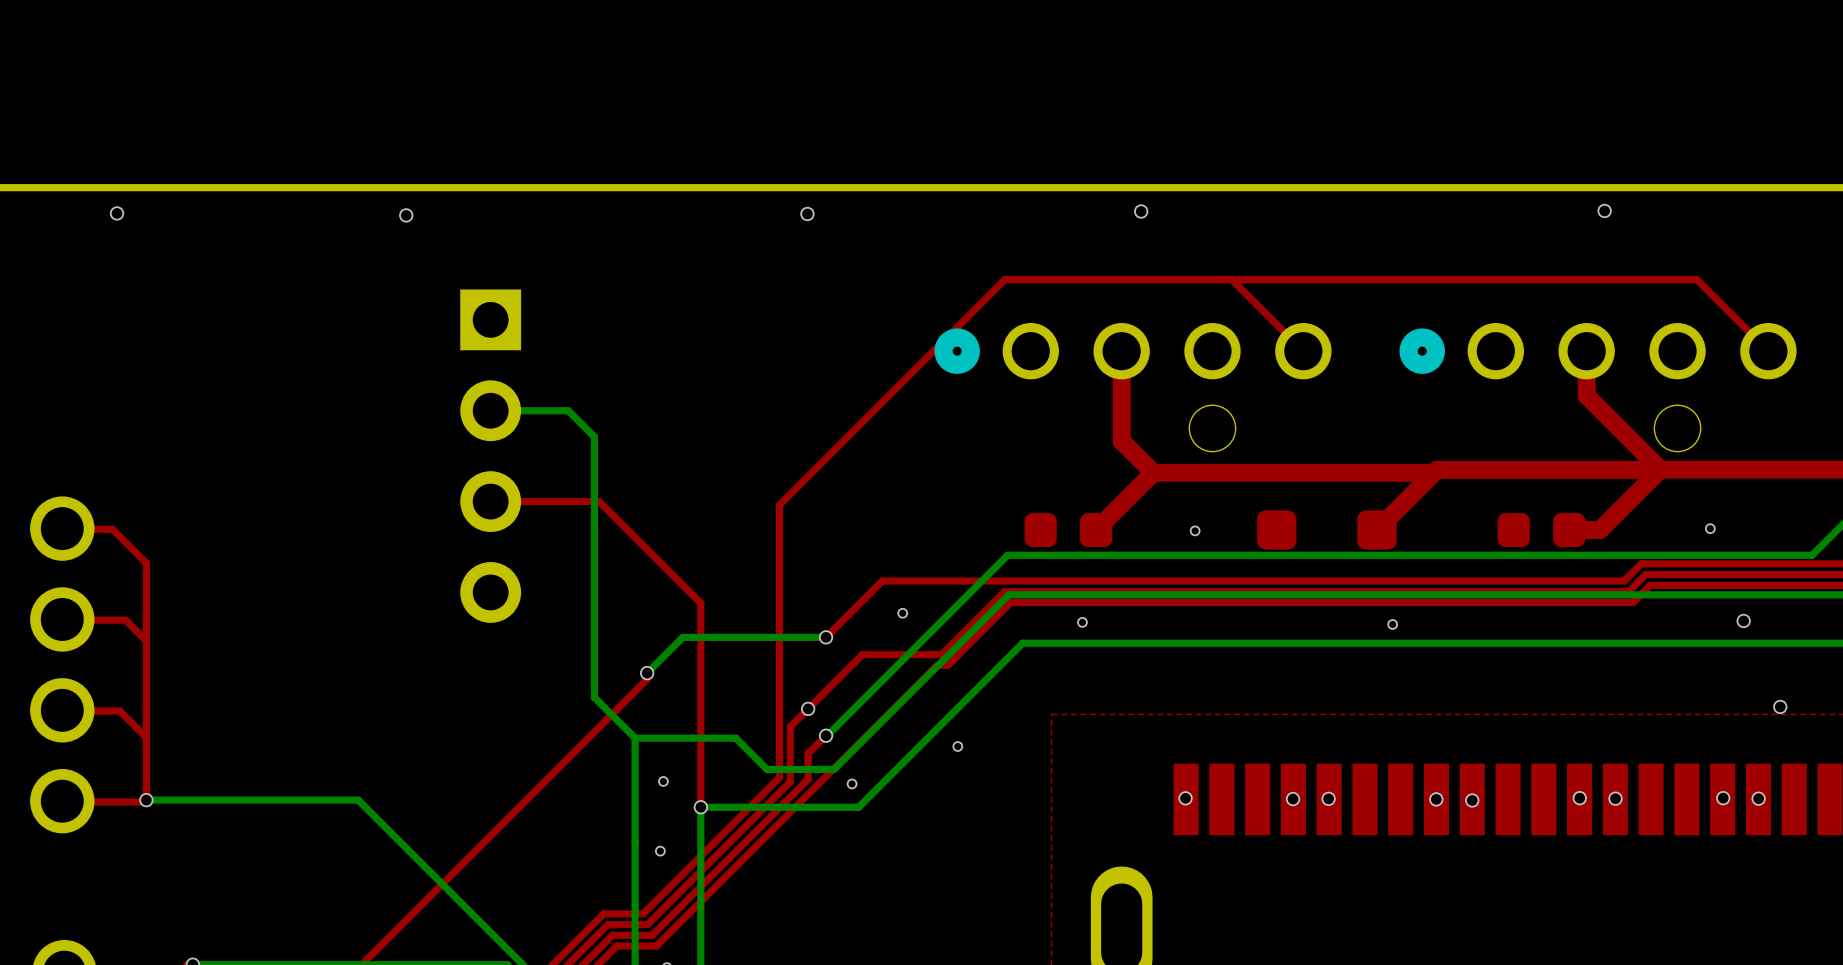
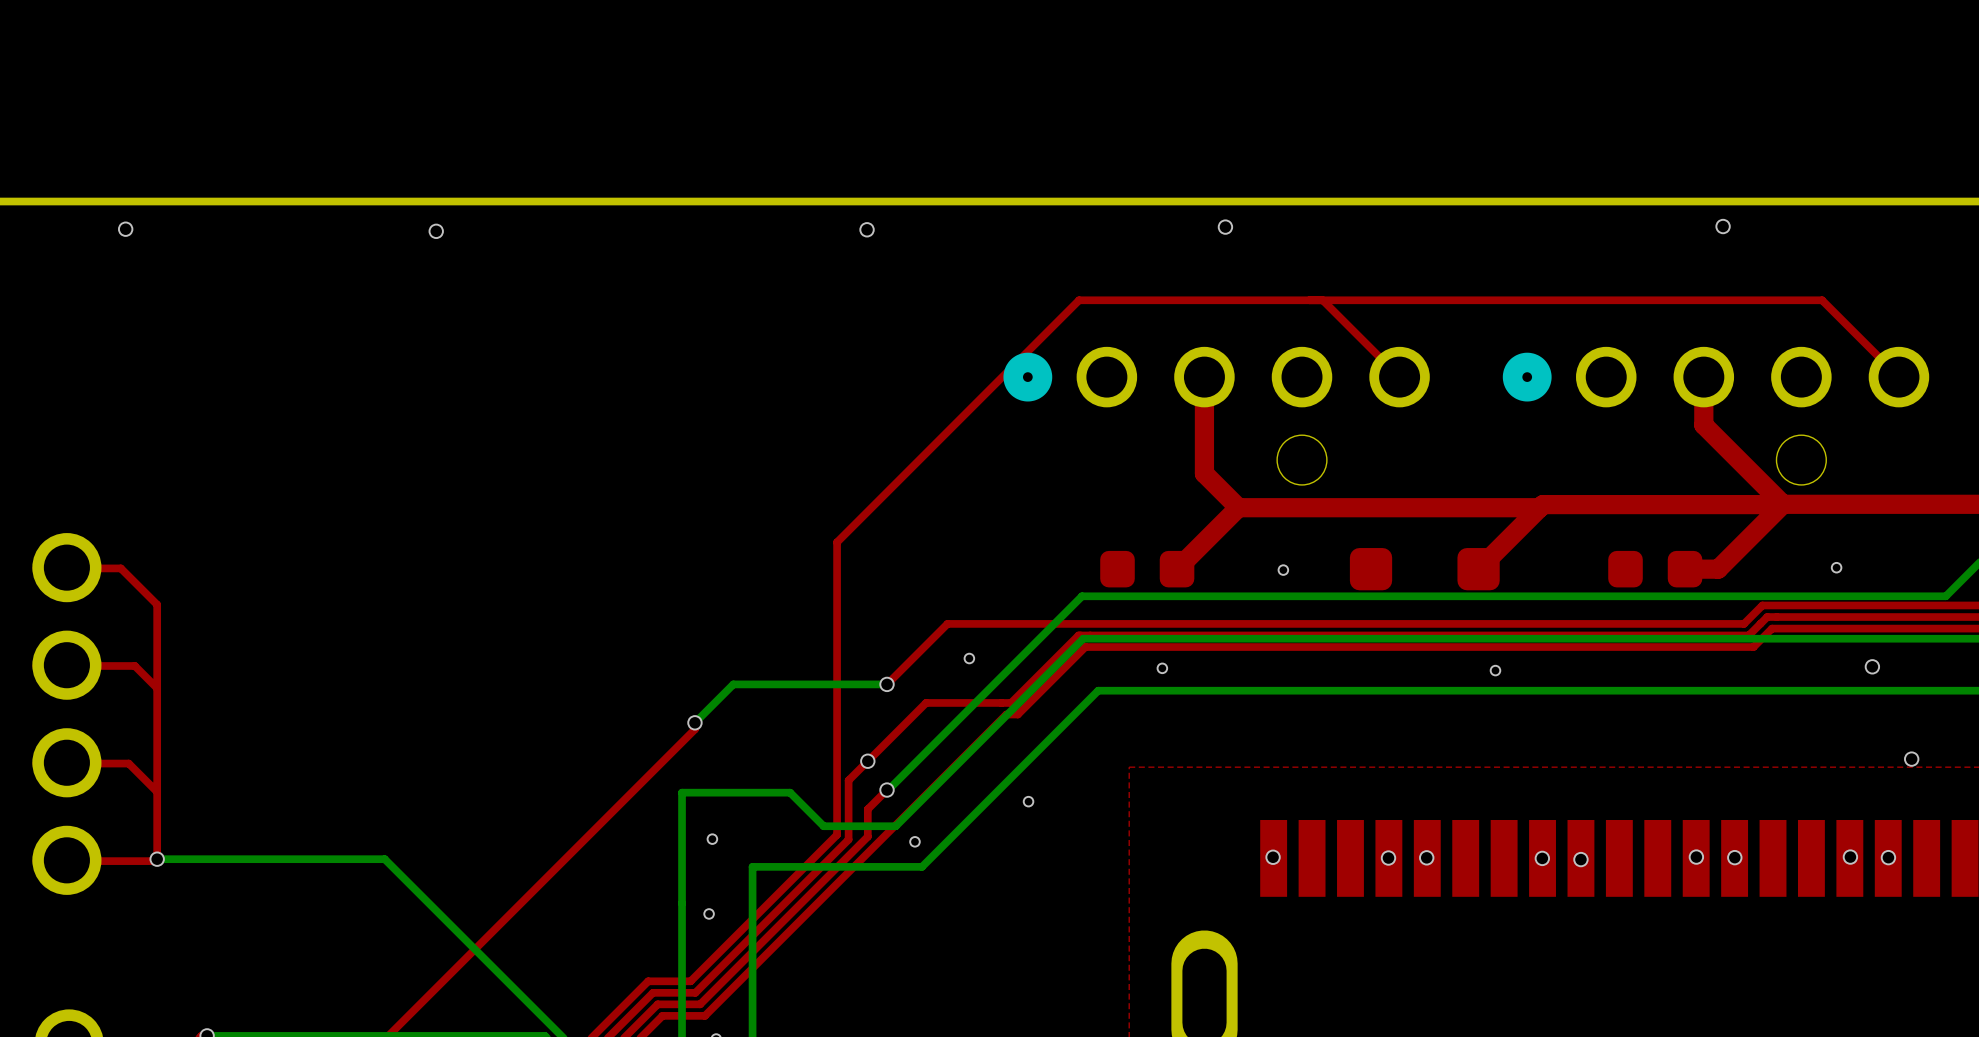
bottom track: (490, 410) (568, 410) (594, 436) (594, 697) (635, 738) -> none
part: (490, 456) -> none
top track: (490, 501) (599, 501) (700, 603) (700, 807) -> none
via: (700, 807) -> none

